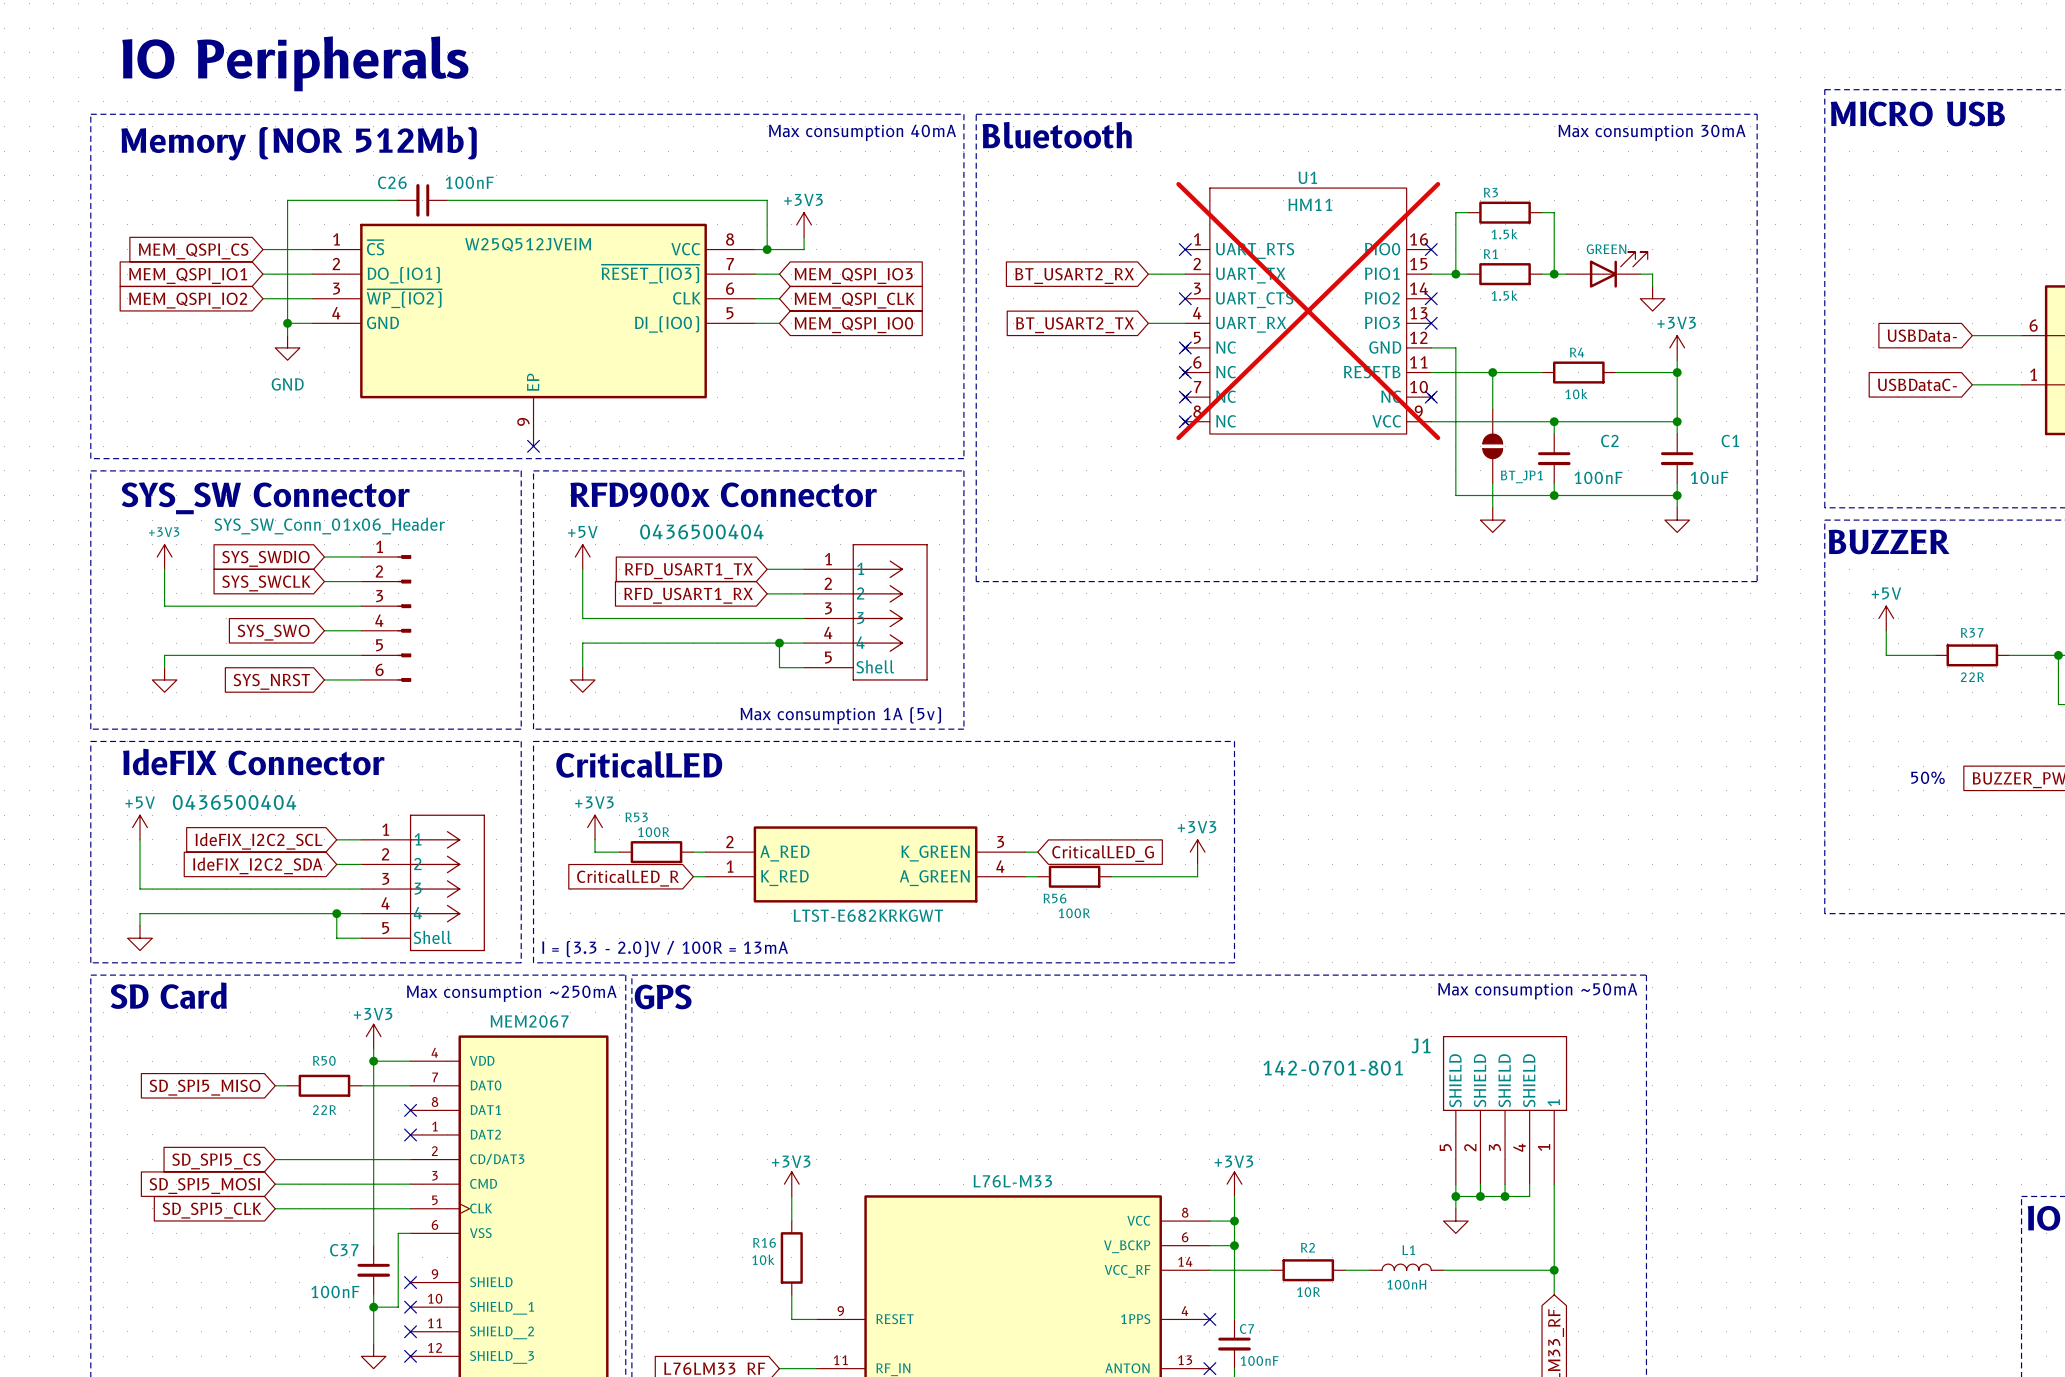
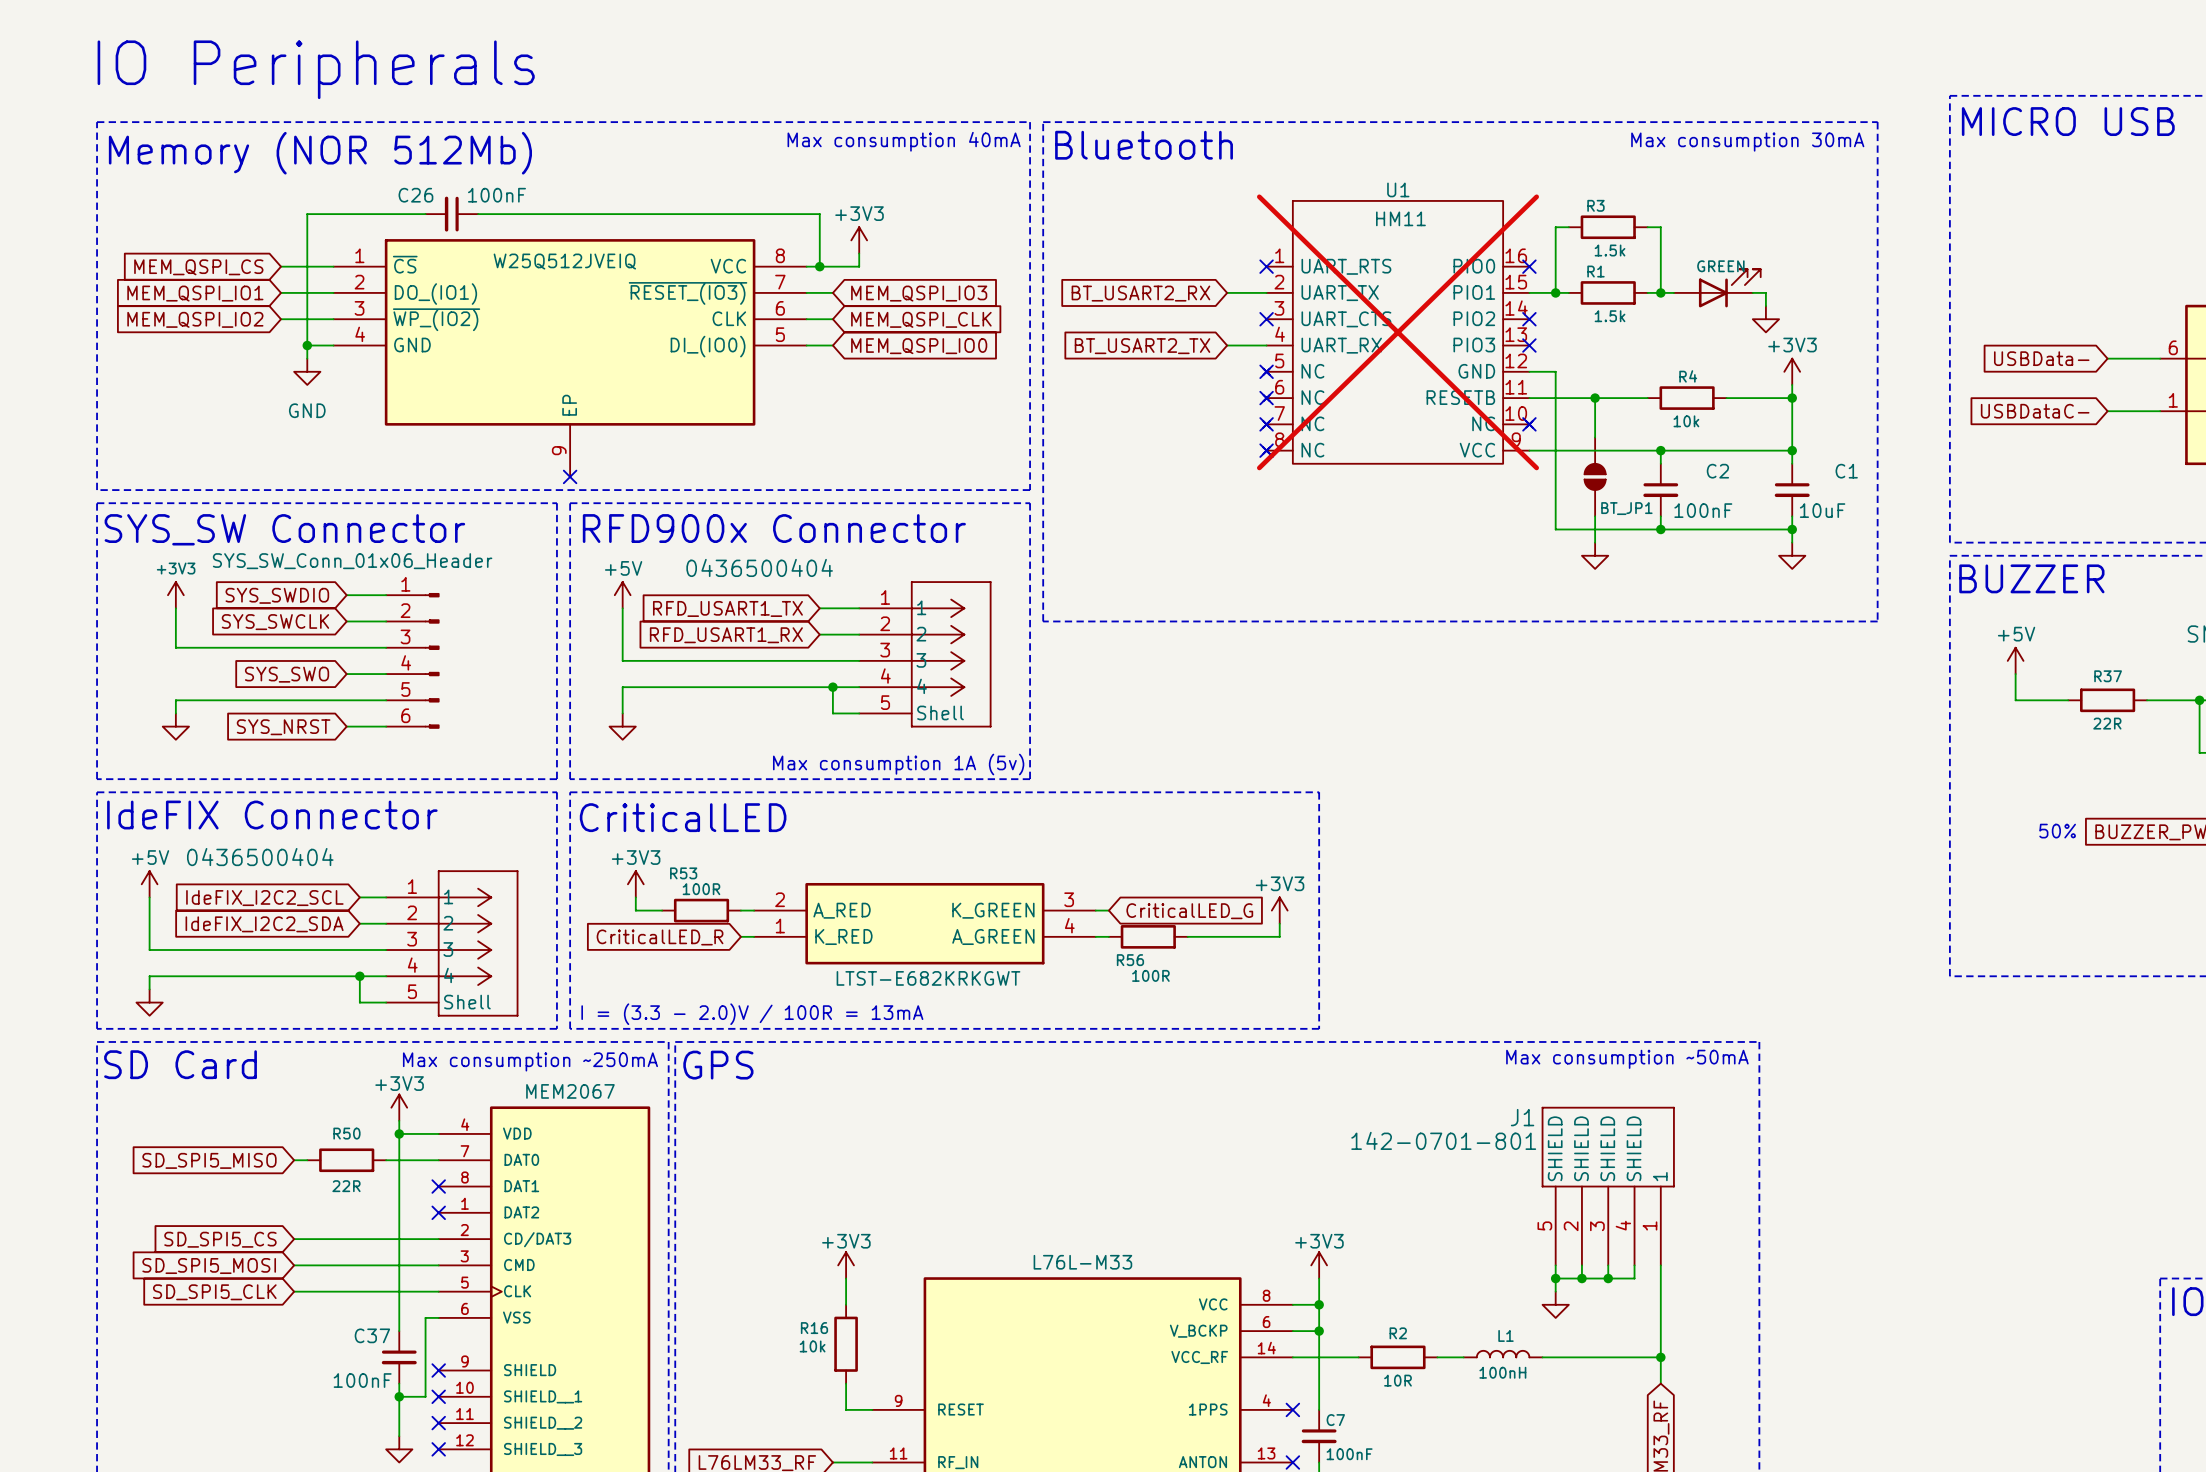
part value: W25Q512JVEIM (528, 244) -> W25Q512JVEIQ (564, 261)

